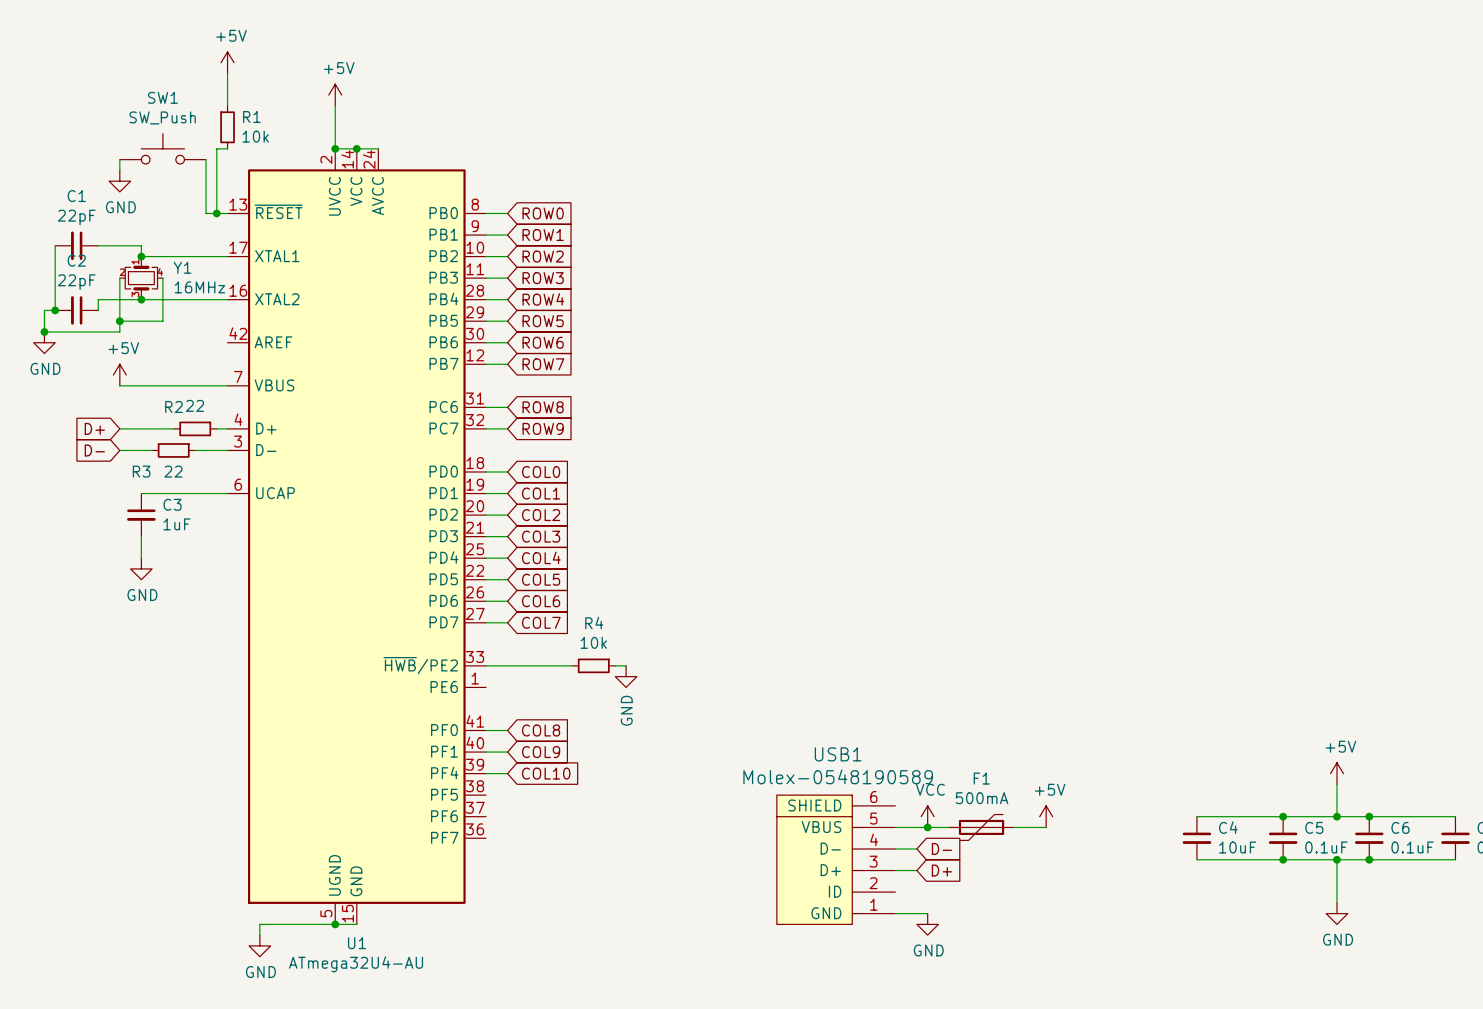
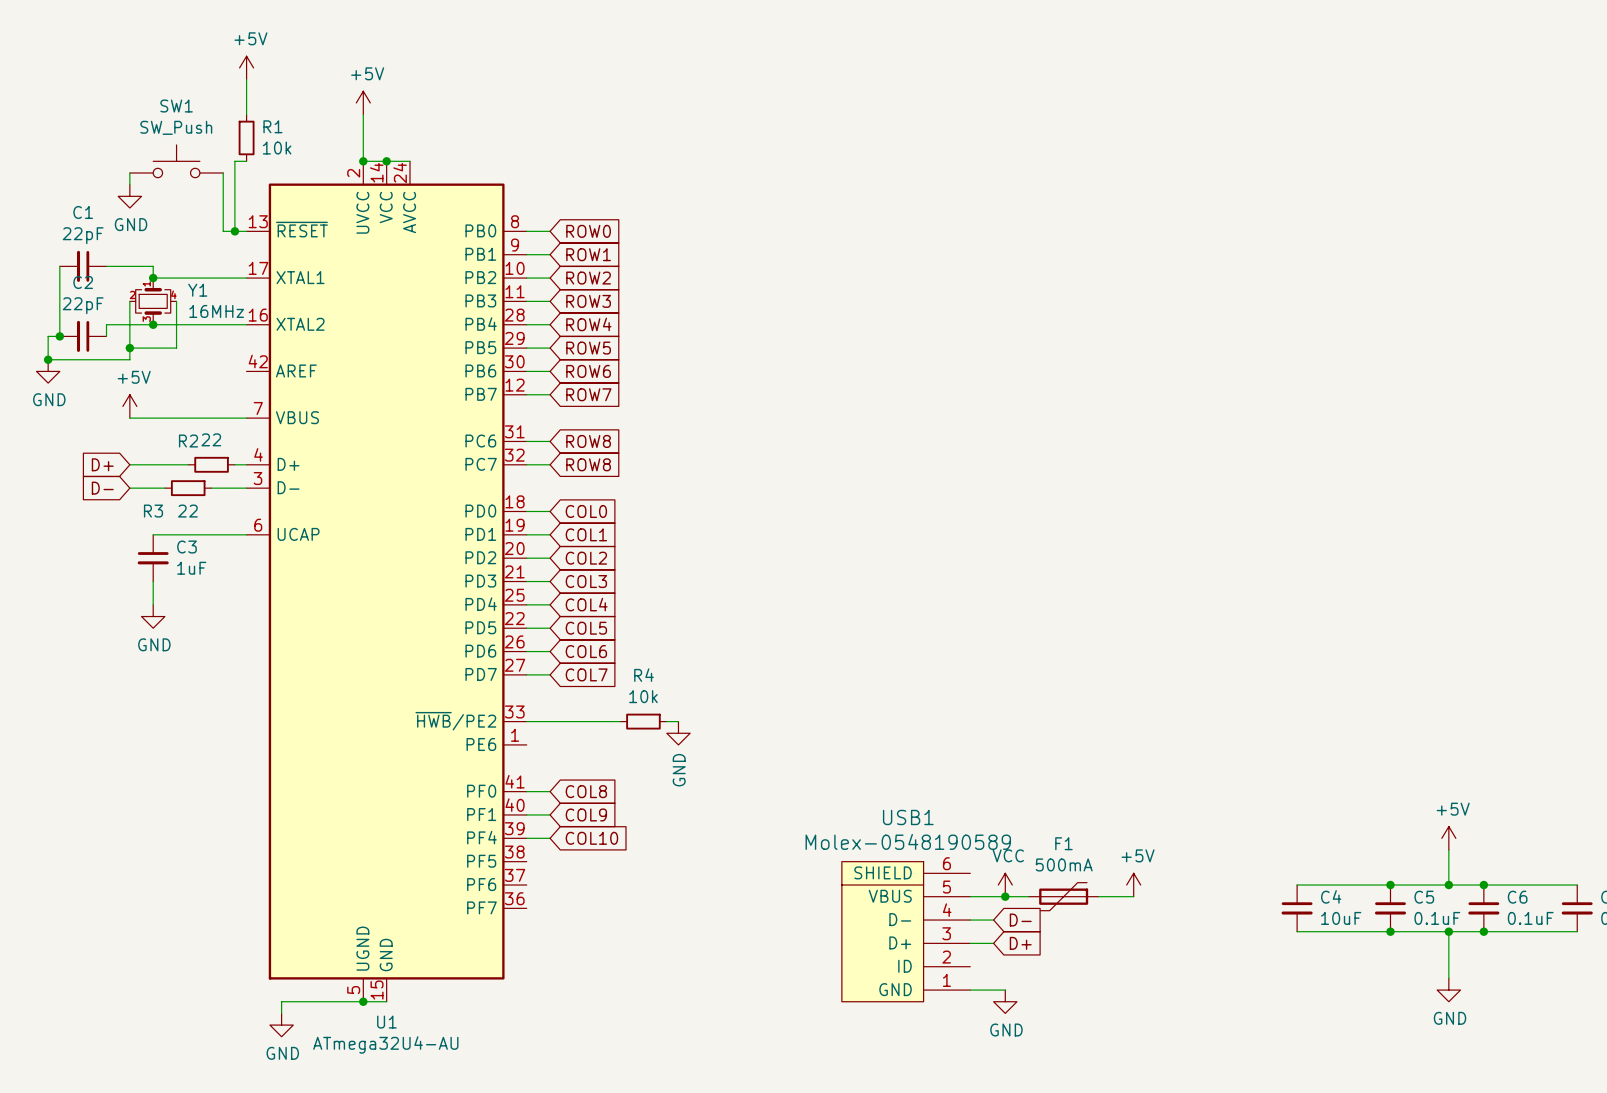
global label: ROW9 (543, 428) -> ROW8 (588, 464)

